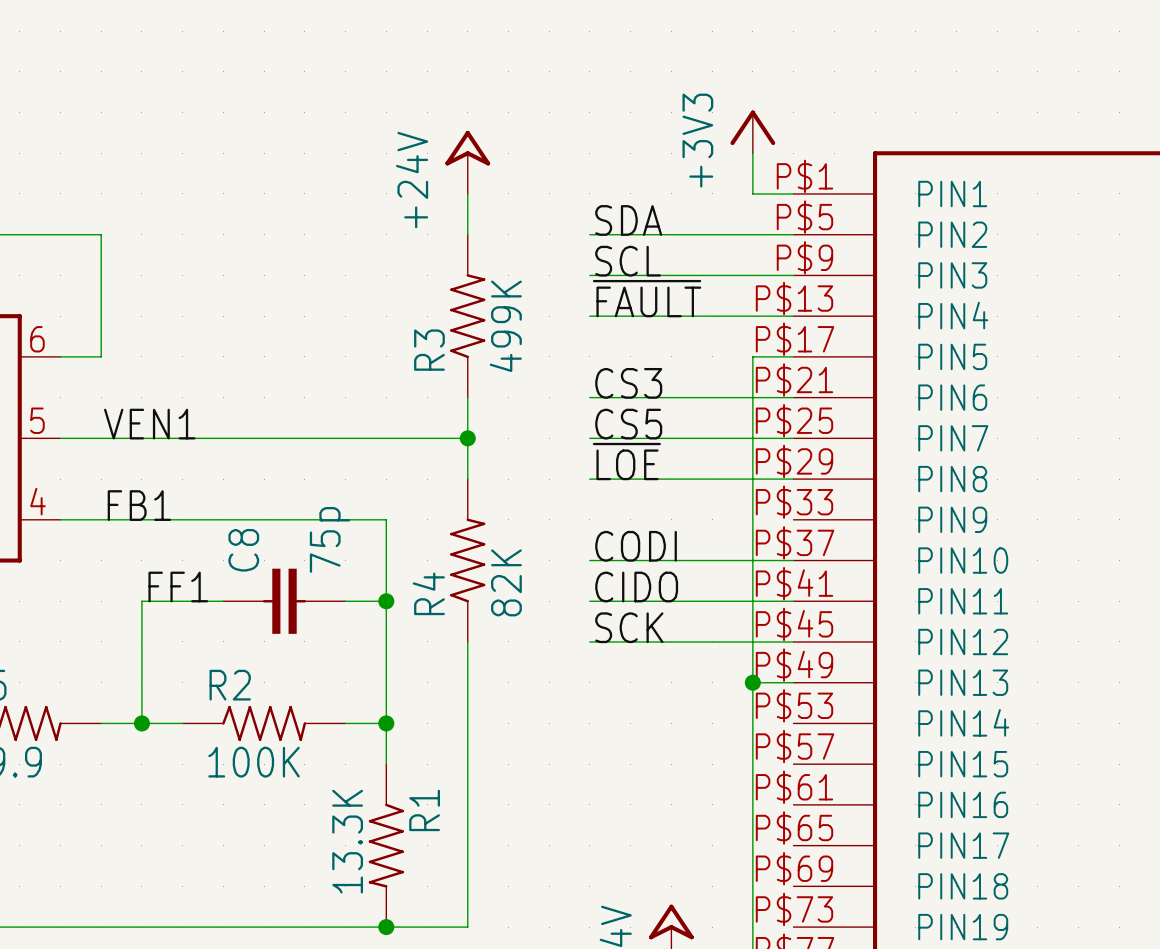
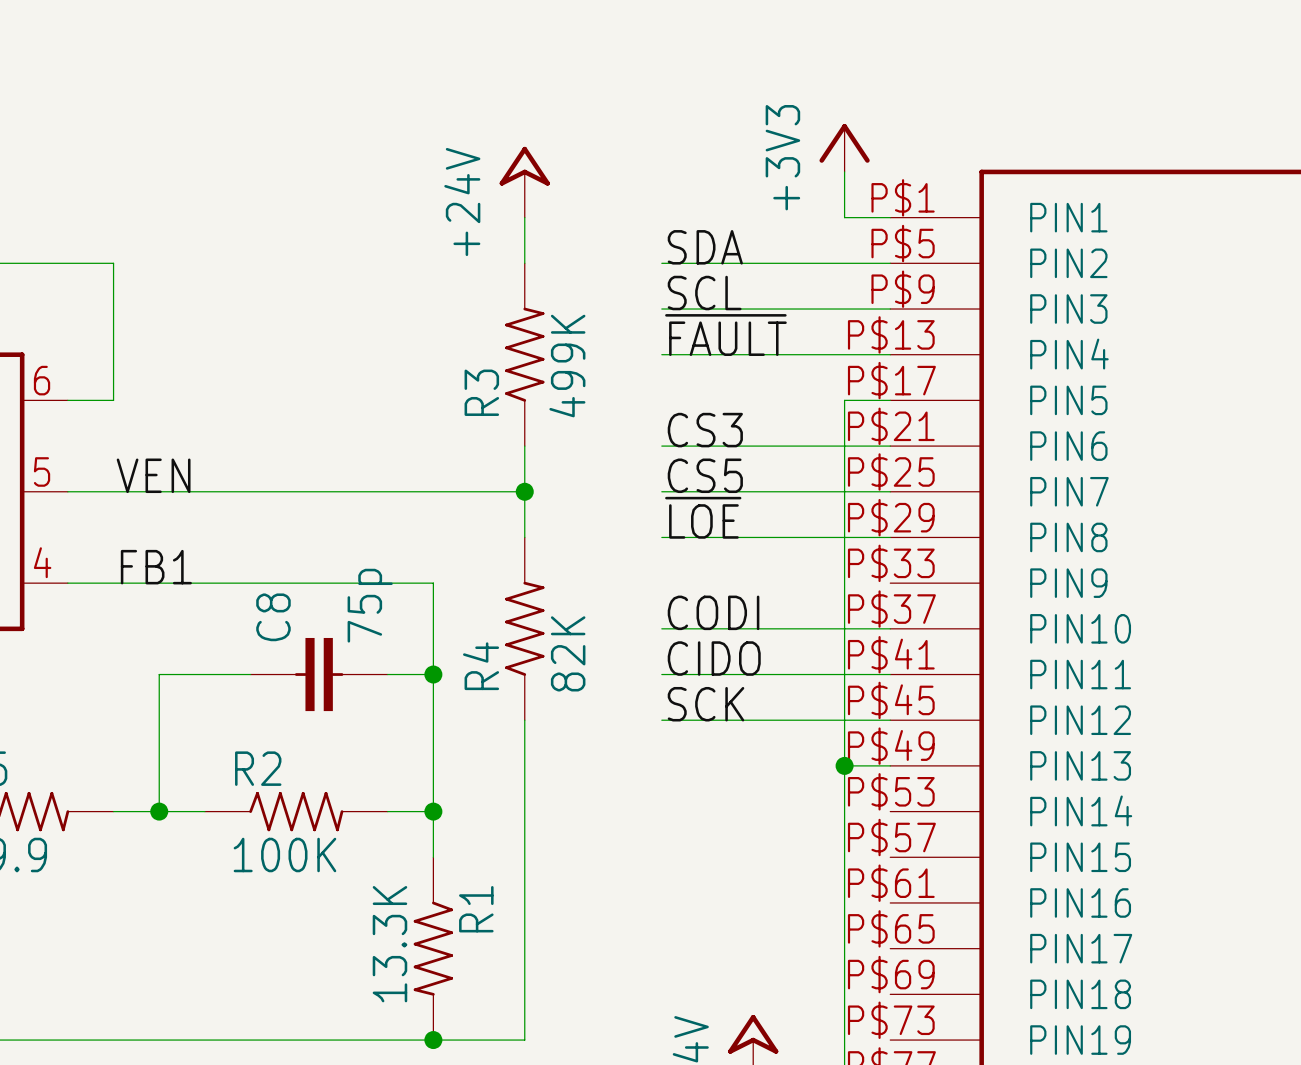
label: VEN1 (149, 424) -> VEN (153, 475)
label: FF1 (178, 587) -> none

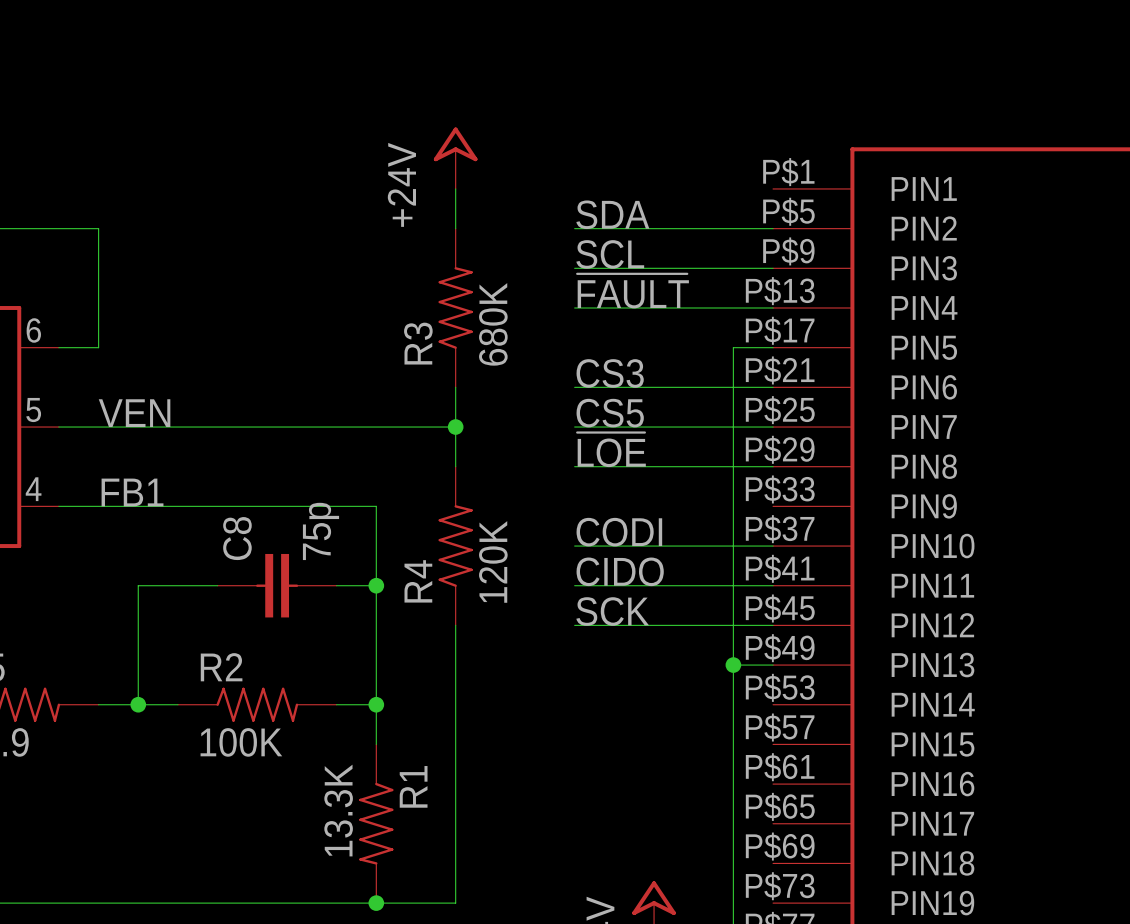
power symbol: +3V3 (844, 147) -> none
wire: (844, 171) (844, 217) (890, 217) -> none
R3 value: 499K (567, 366) -> 680K (493, 324)
R4 value: 82K (568, 653) -> 120K (493, 561)

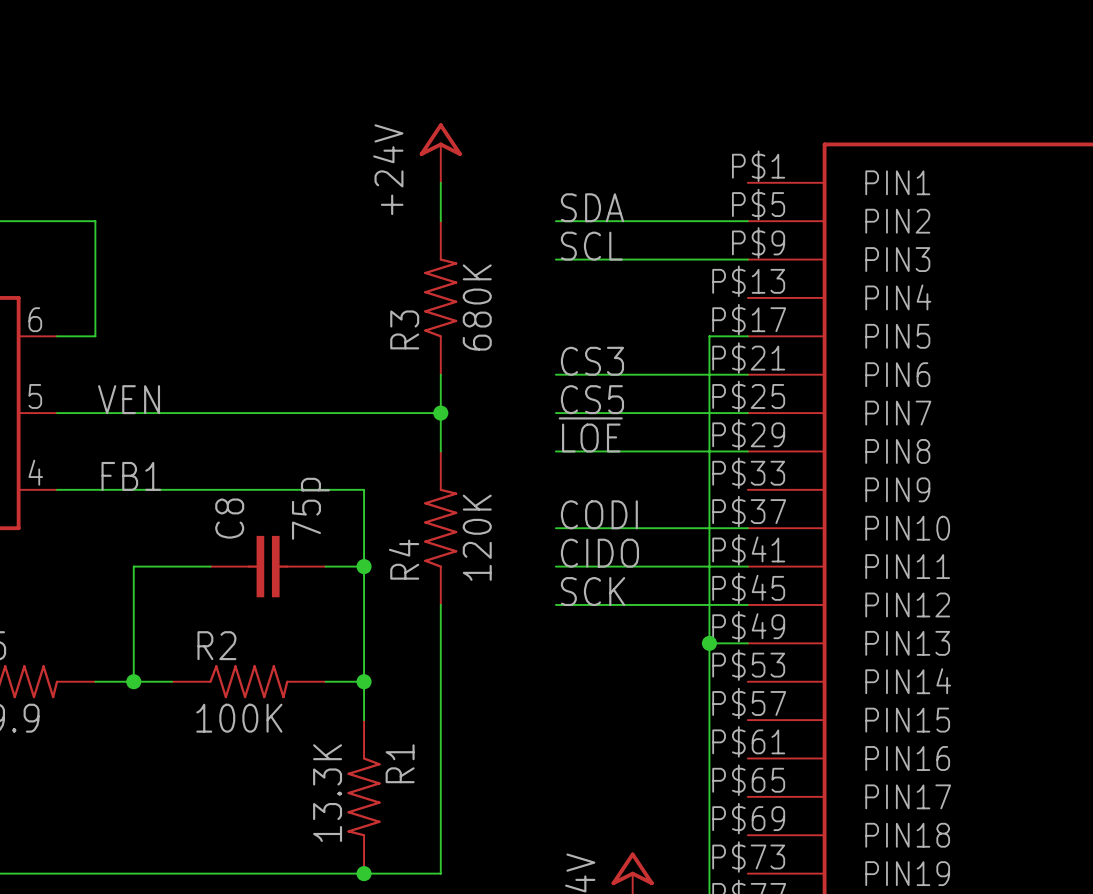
label: ~{FAULT} (633, 291) -> none
wire: (574, 307) (773, 307) -> none

